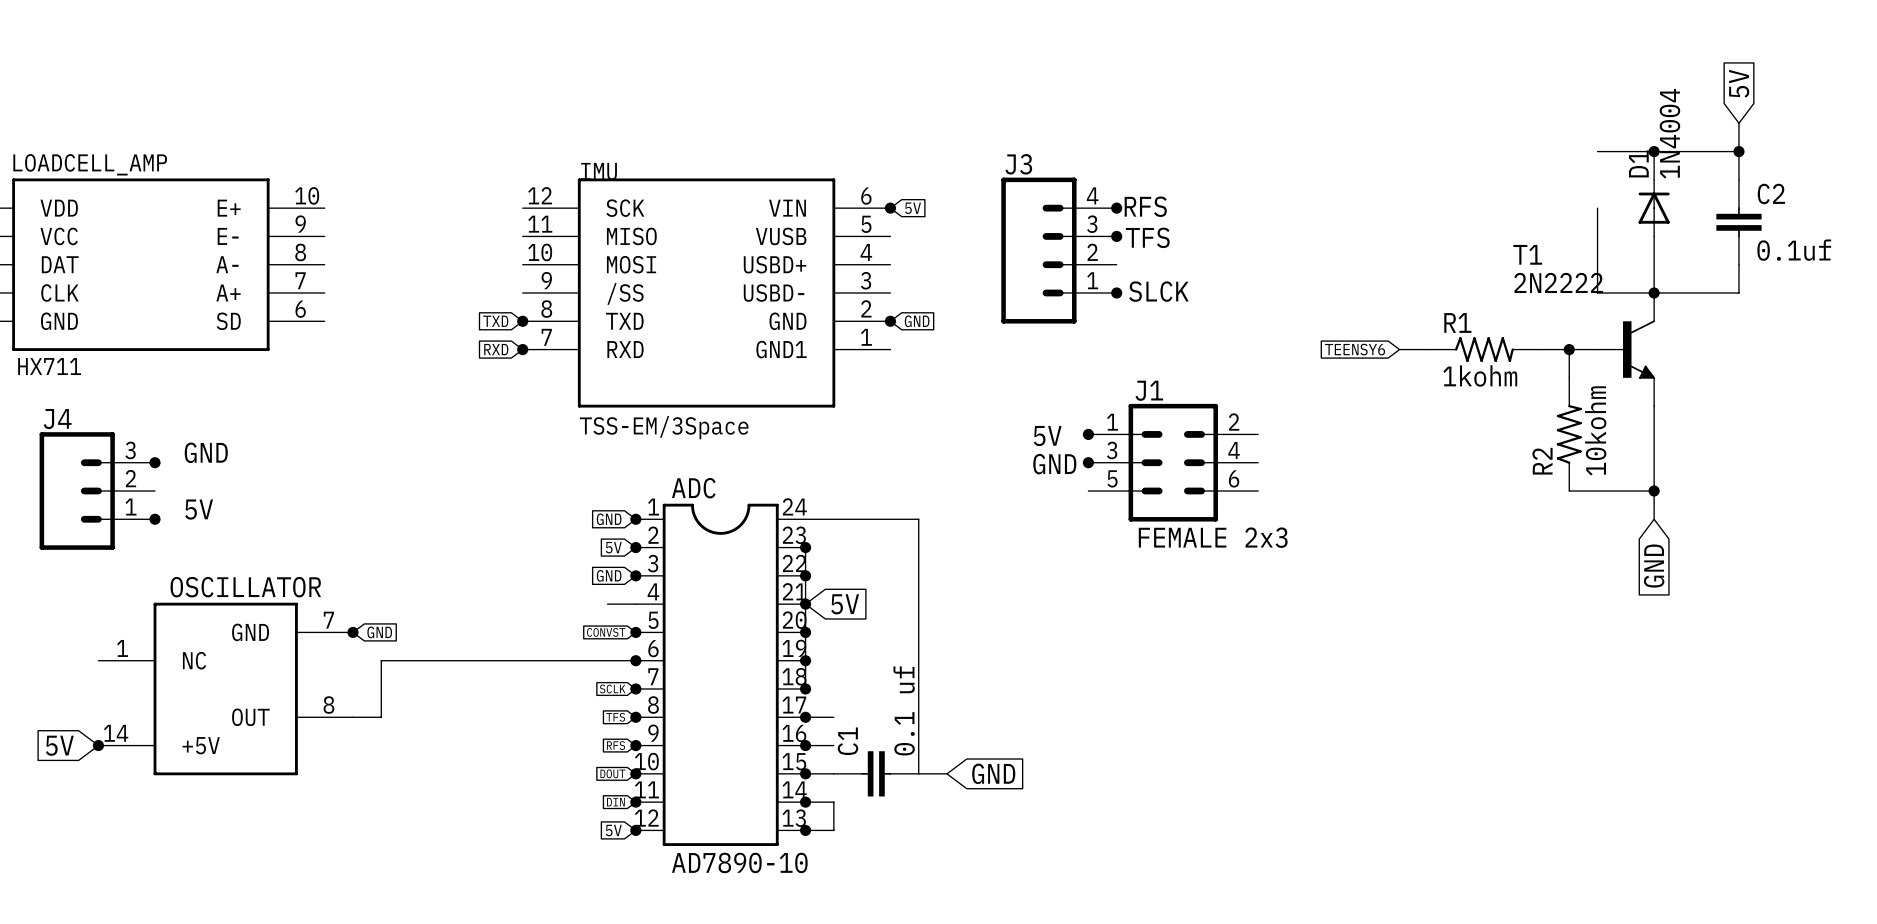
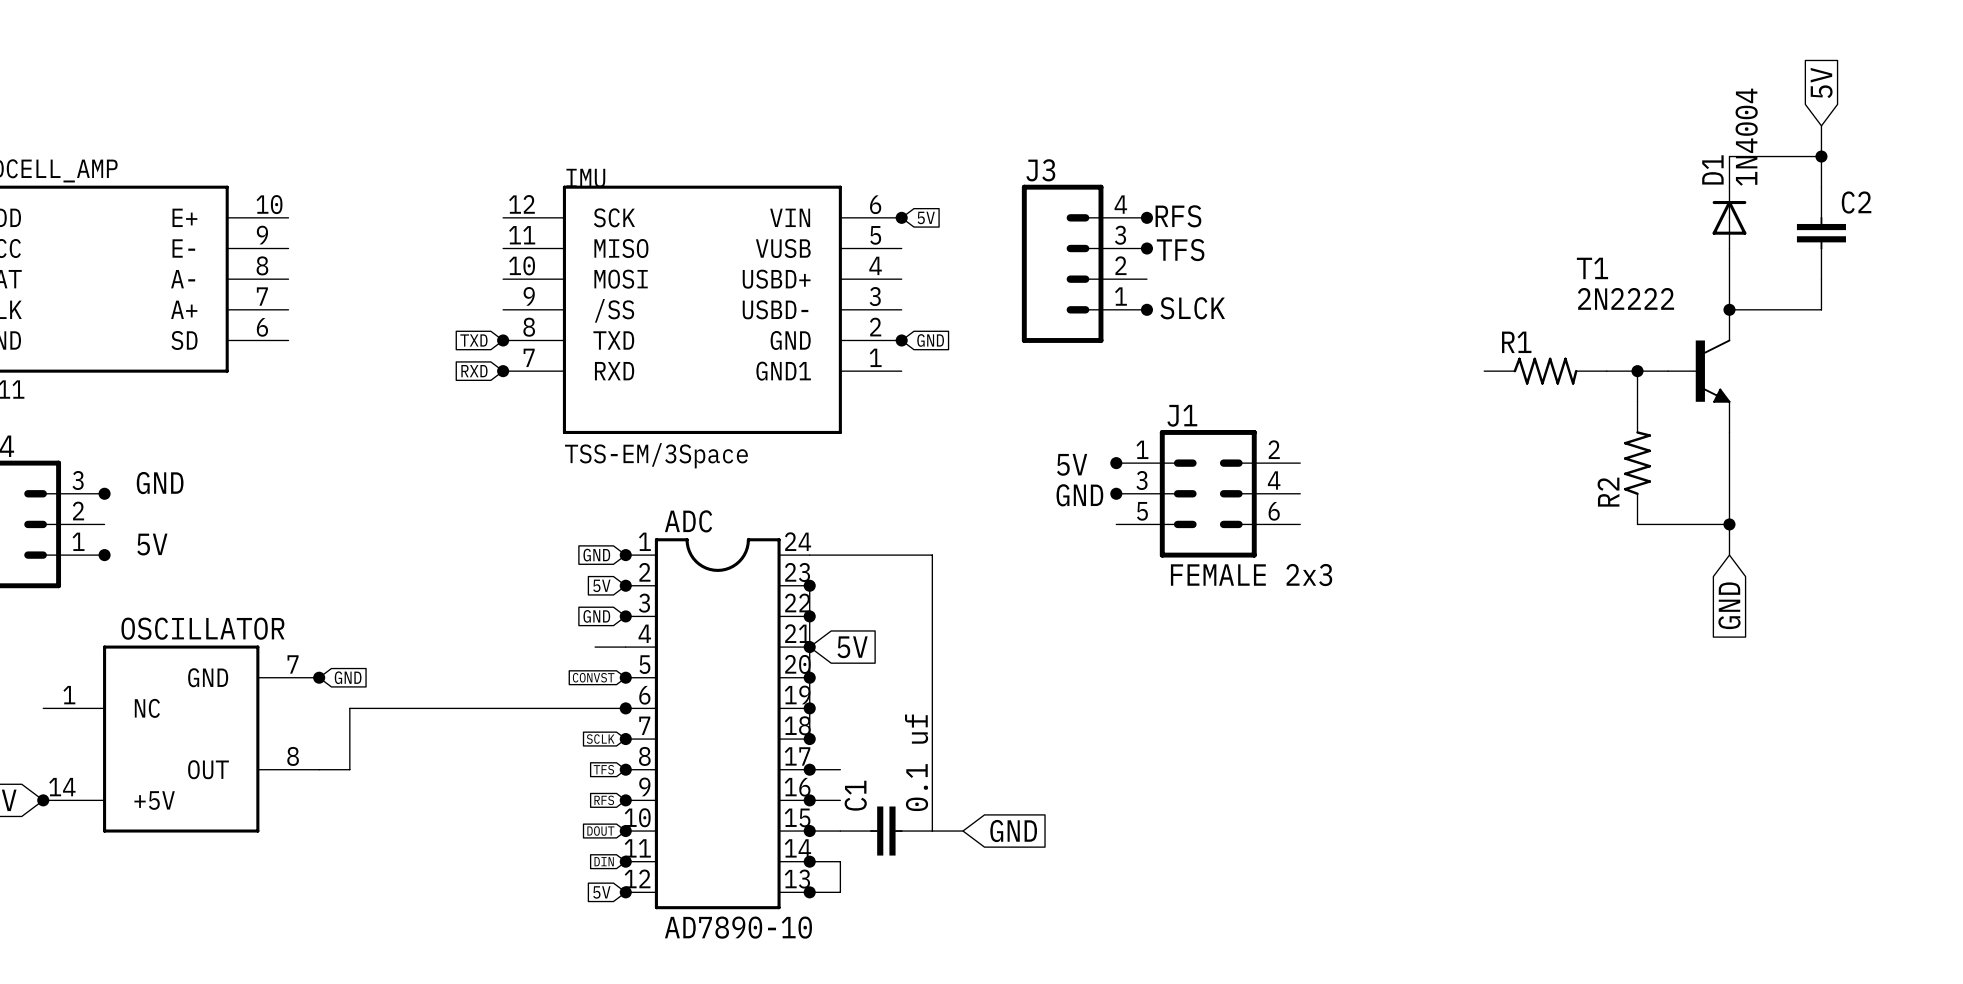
wire: (1597, 151) (1654, 151) -> none
junction: (1654, 151) -> none
wire: (1597, 208) (1597, 293) (1654, 293) -> none
C2 value: 0.1uf (1794, 250) -> none
global label: TEENSY6 (1355, 349) -> none
wire: (1399, 349) (1427, 349) -> none
R1 value: 1kohm (1480, 376) -> none
R2 value: 10kohm (1595, 430) -> none

